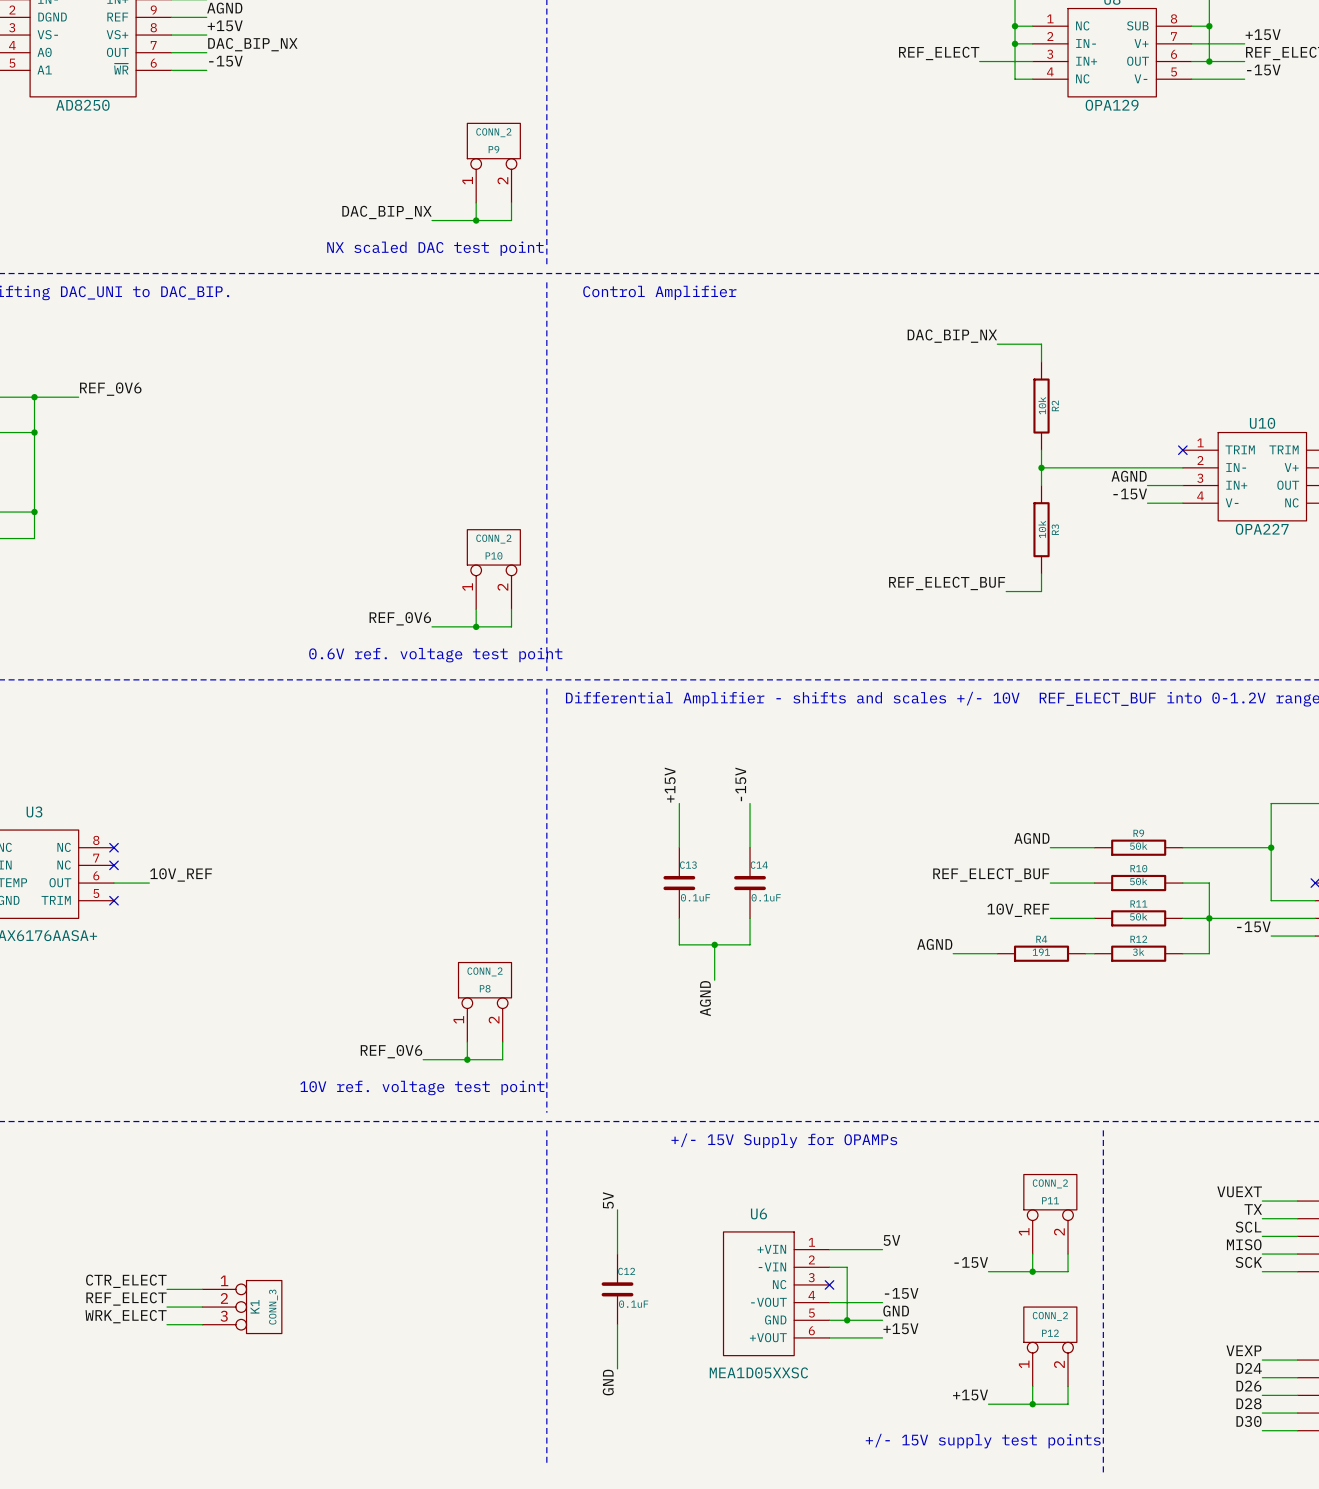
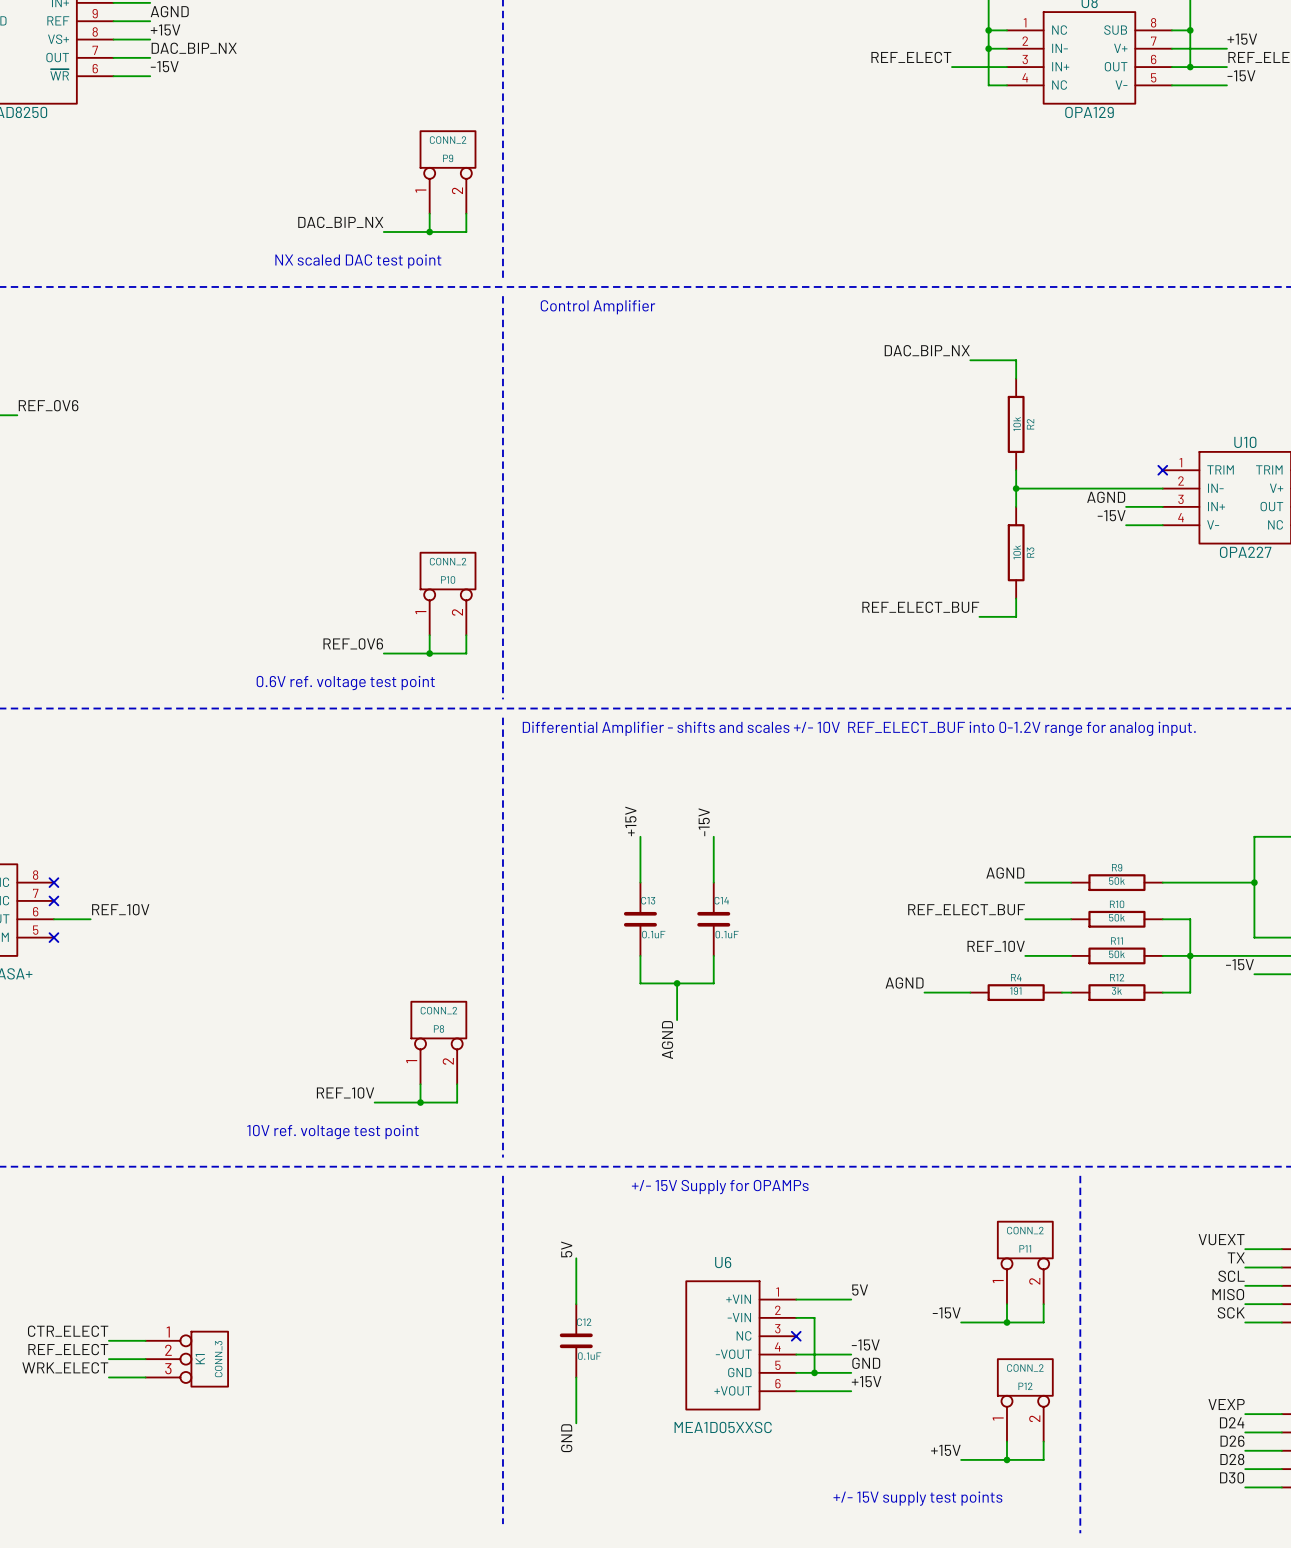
label: 10V_REF (181, 874) -> REF_10V (120, 909)
label: 10V_REF (1018, 910) -> REF_10V (996, 946)
label: REF_0V6 (391, 1051) -> REF_10V (345, 1092)

